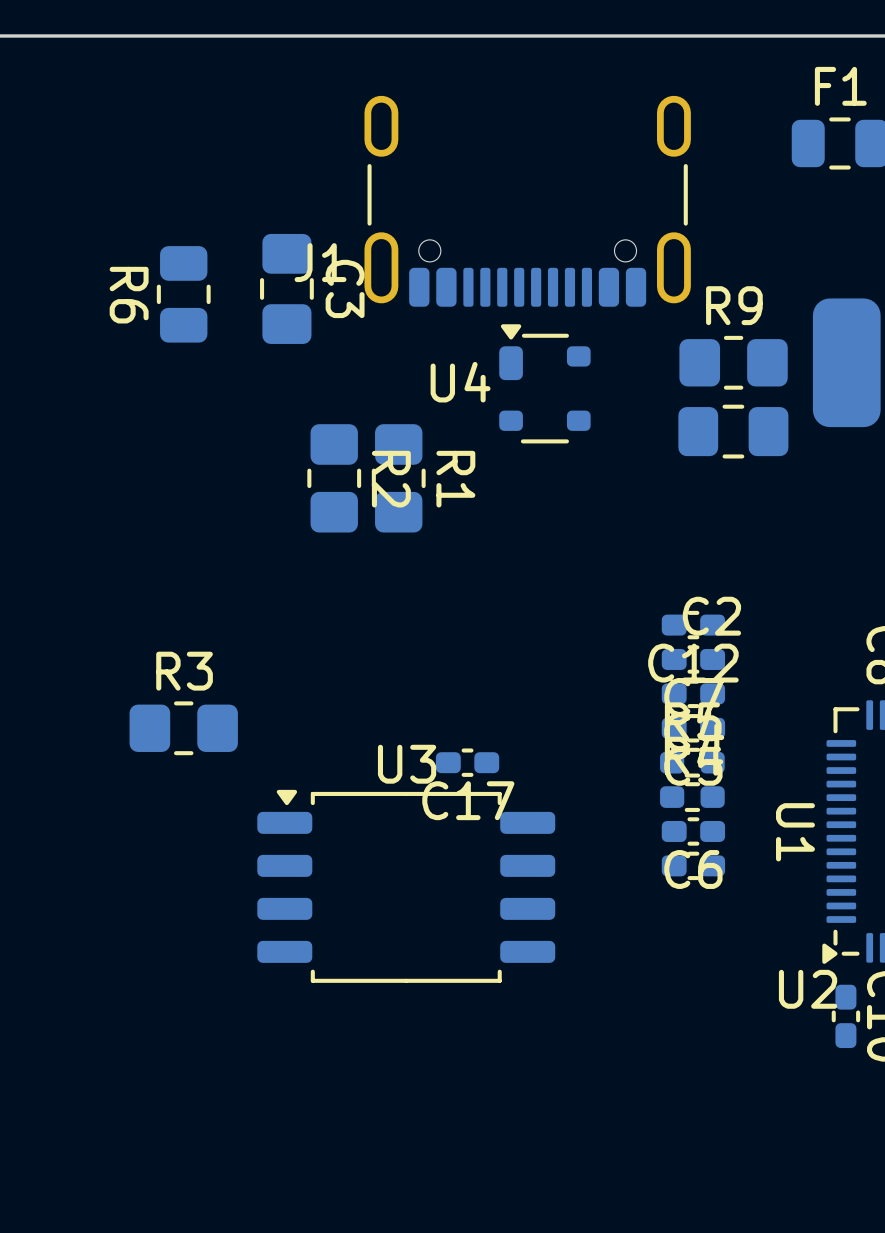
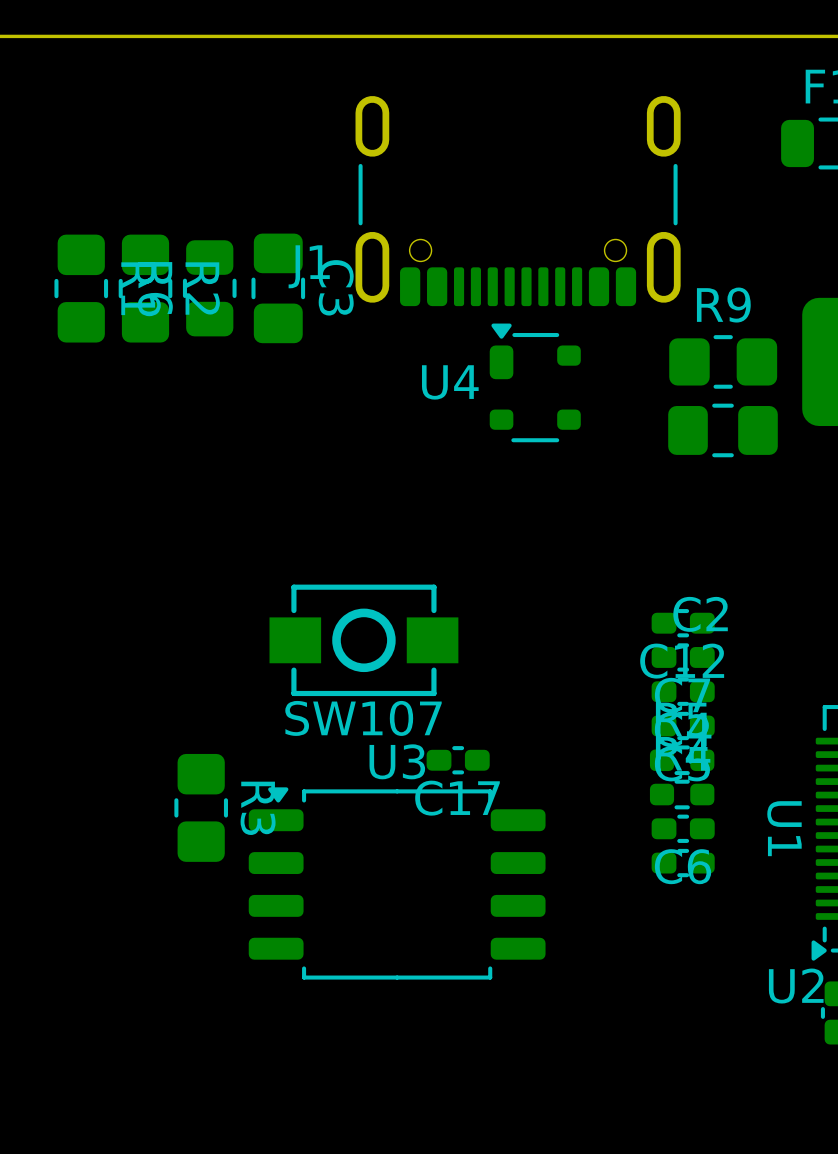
R6 position: (183, 294) -> (209, 288)
R2 position: (334, 478) -> (145, 288)
R1 position: (398, 478) -> (81, 288)
SW107: none -> (363, 640)
R3 rotation: 0° (183, 728) -> 90° clockwise (201, 807)
R3 position: (183, 728) -> (201, 807)

